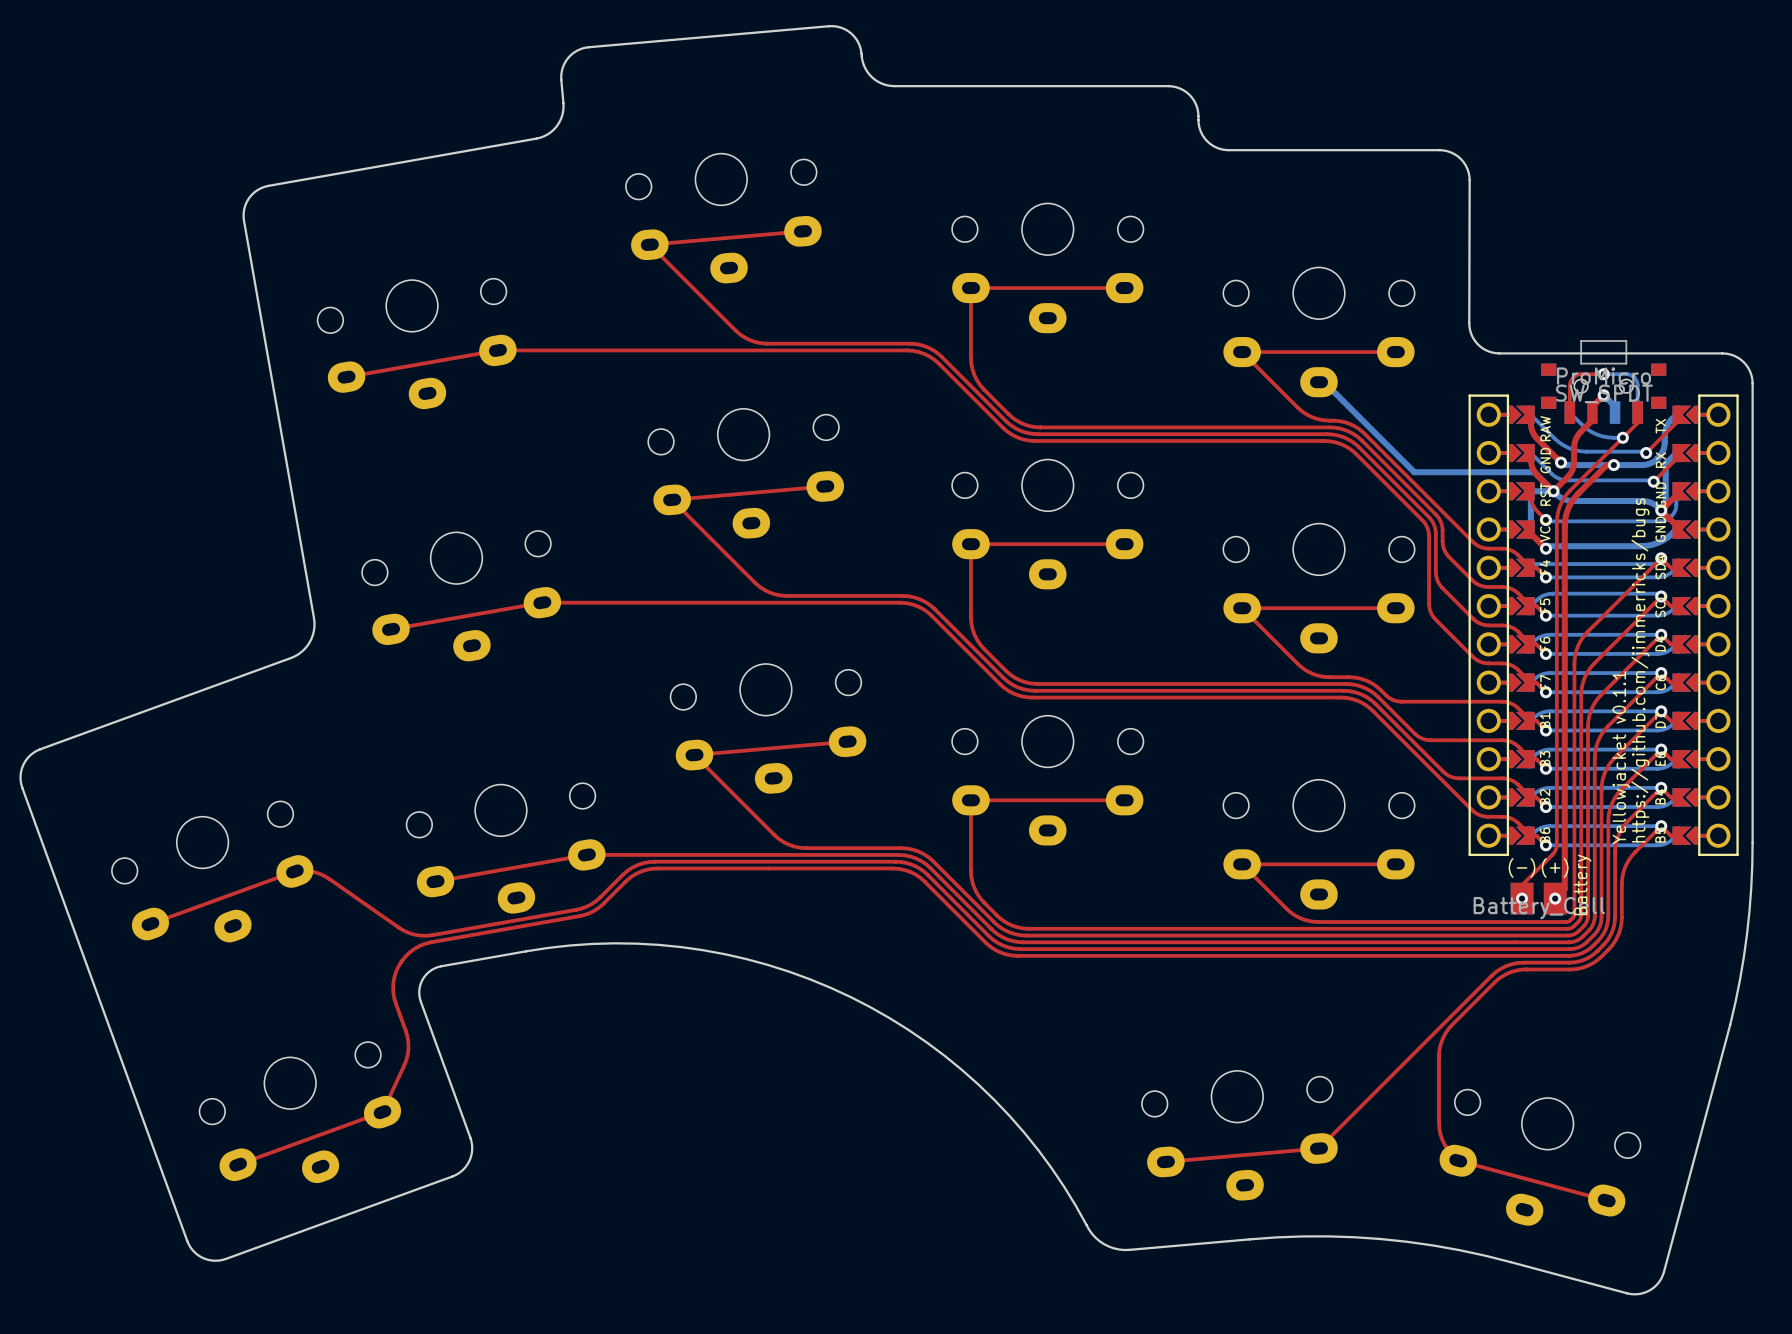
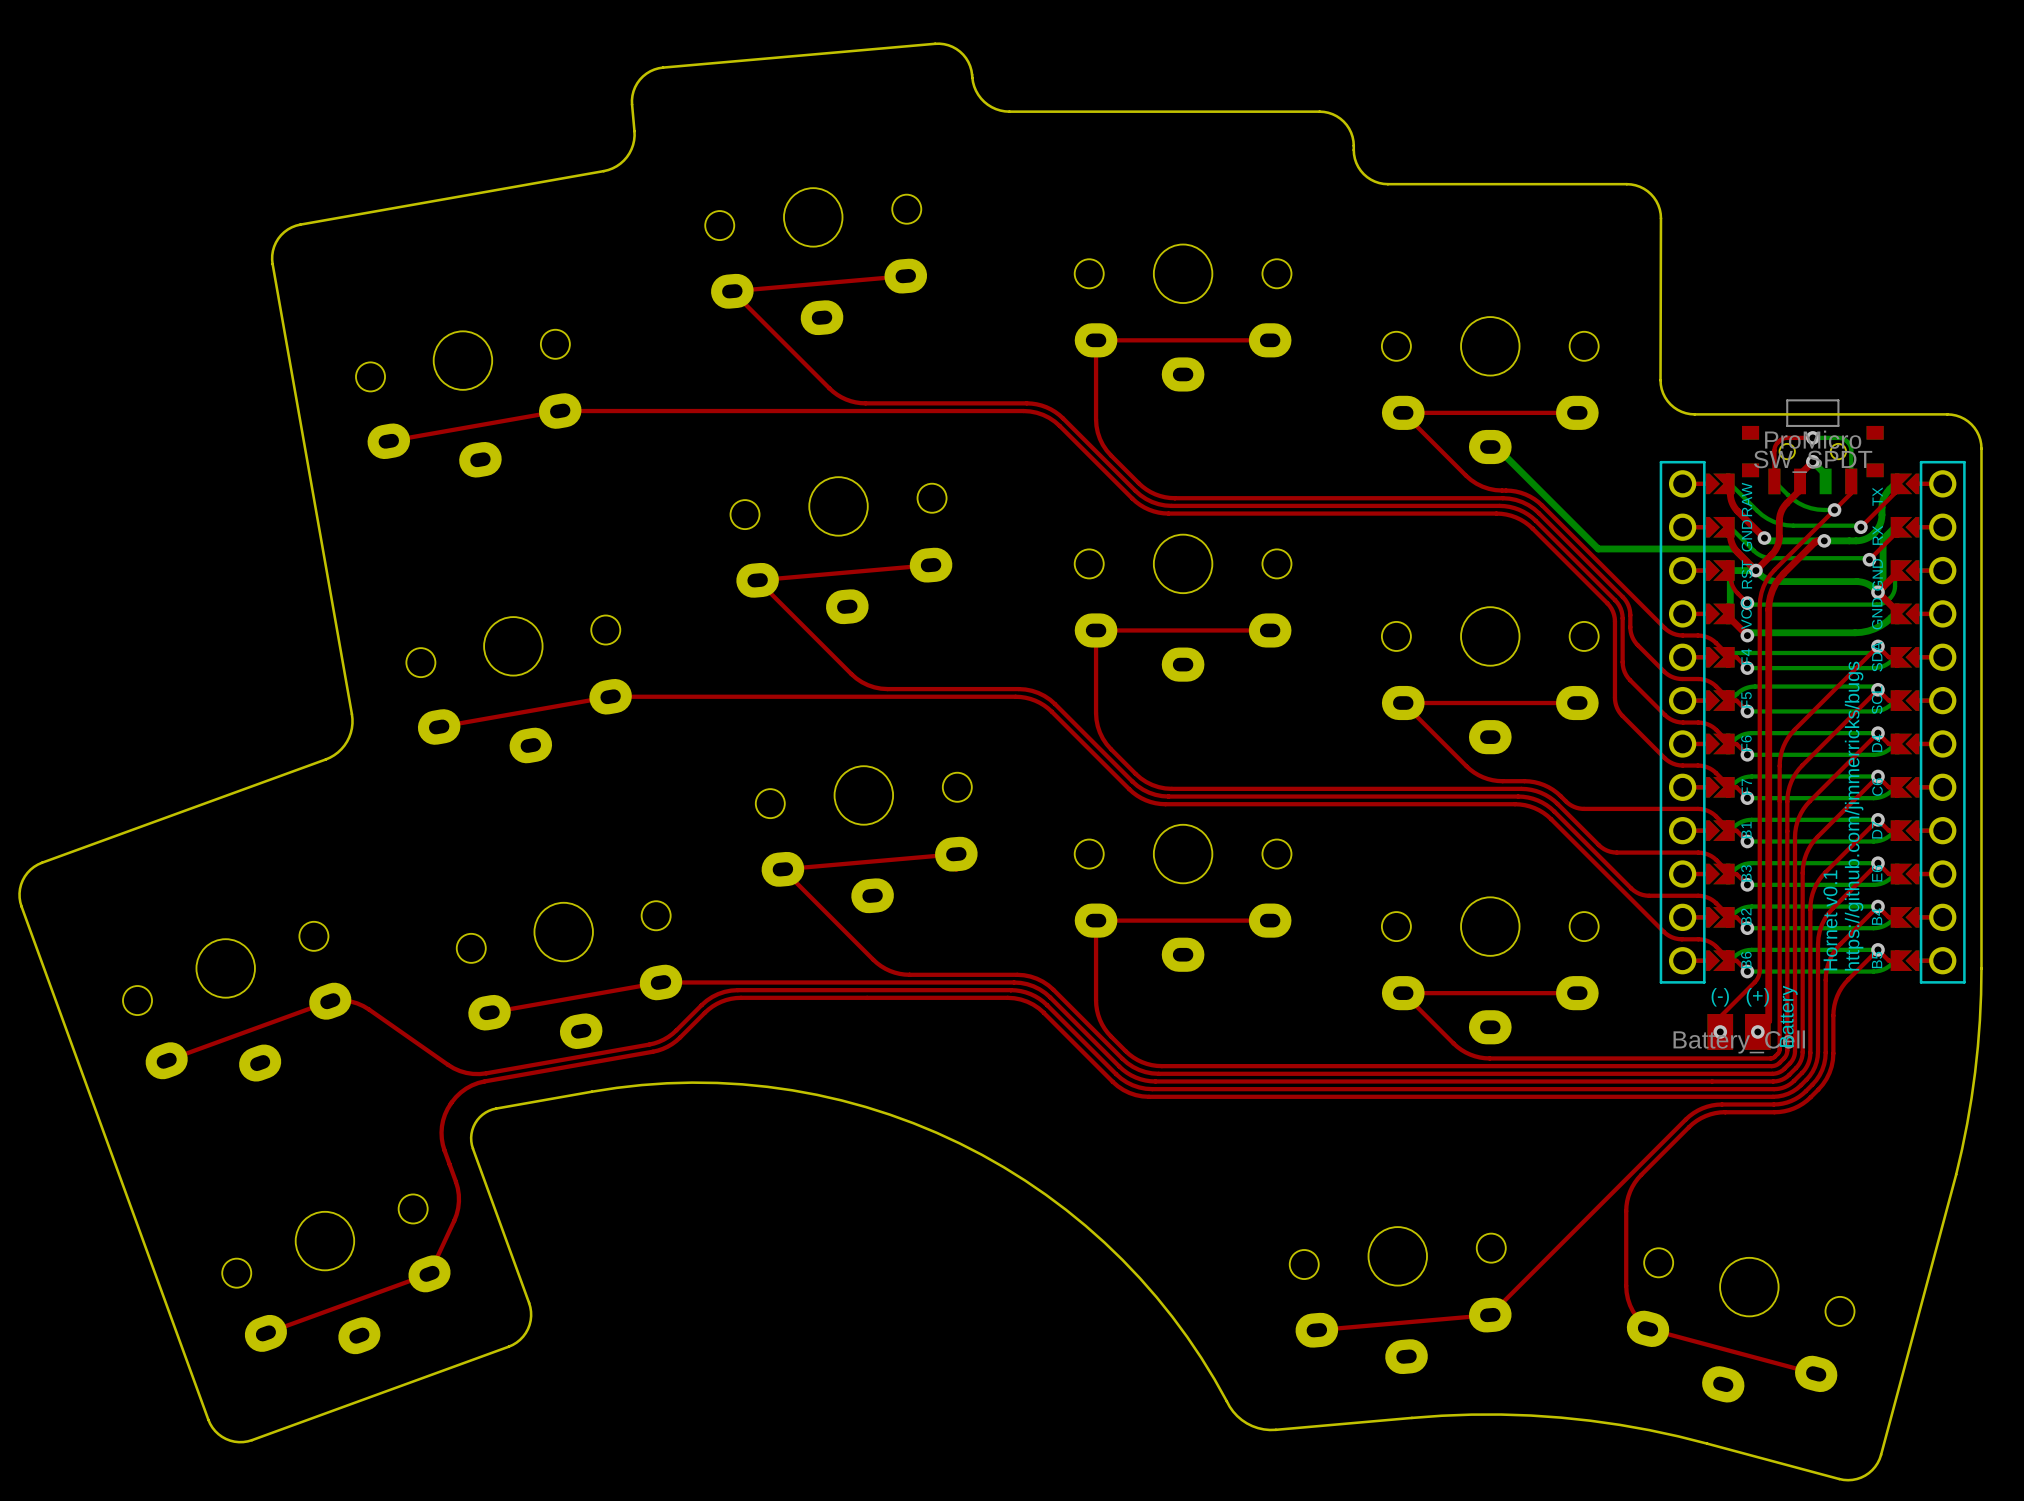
text: Yellowjacket v0.1.1 (1621, 757) -> Hornet v0.1 (1830, 920)

